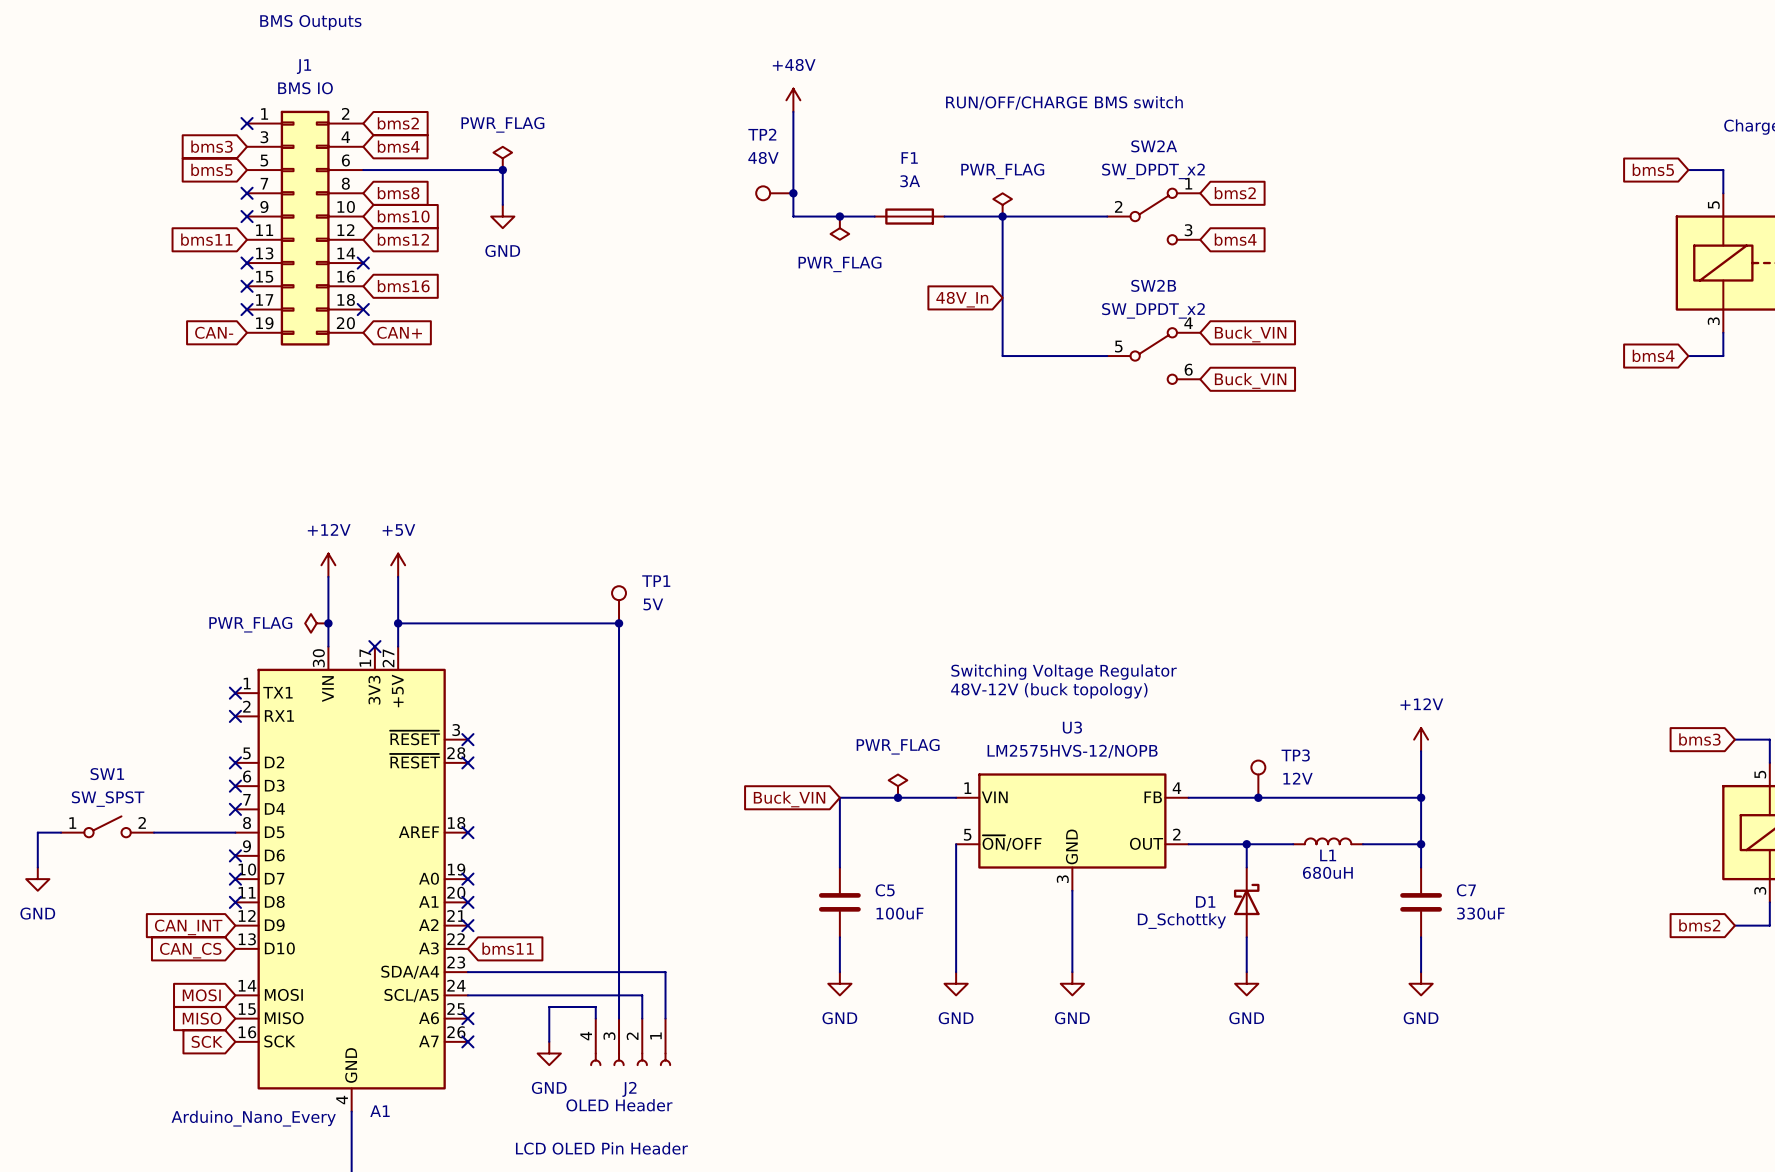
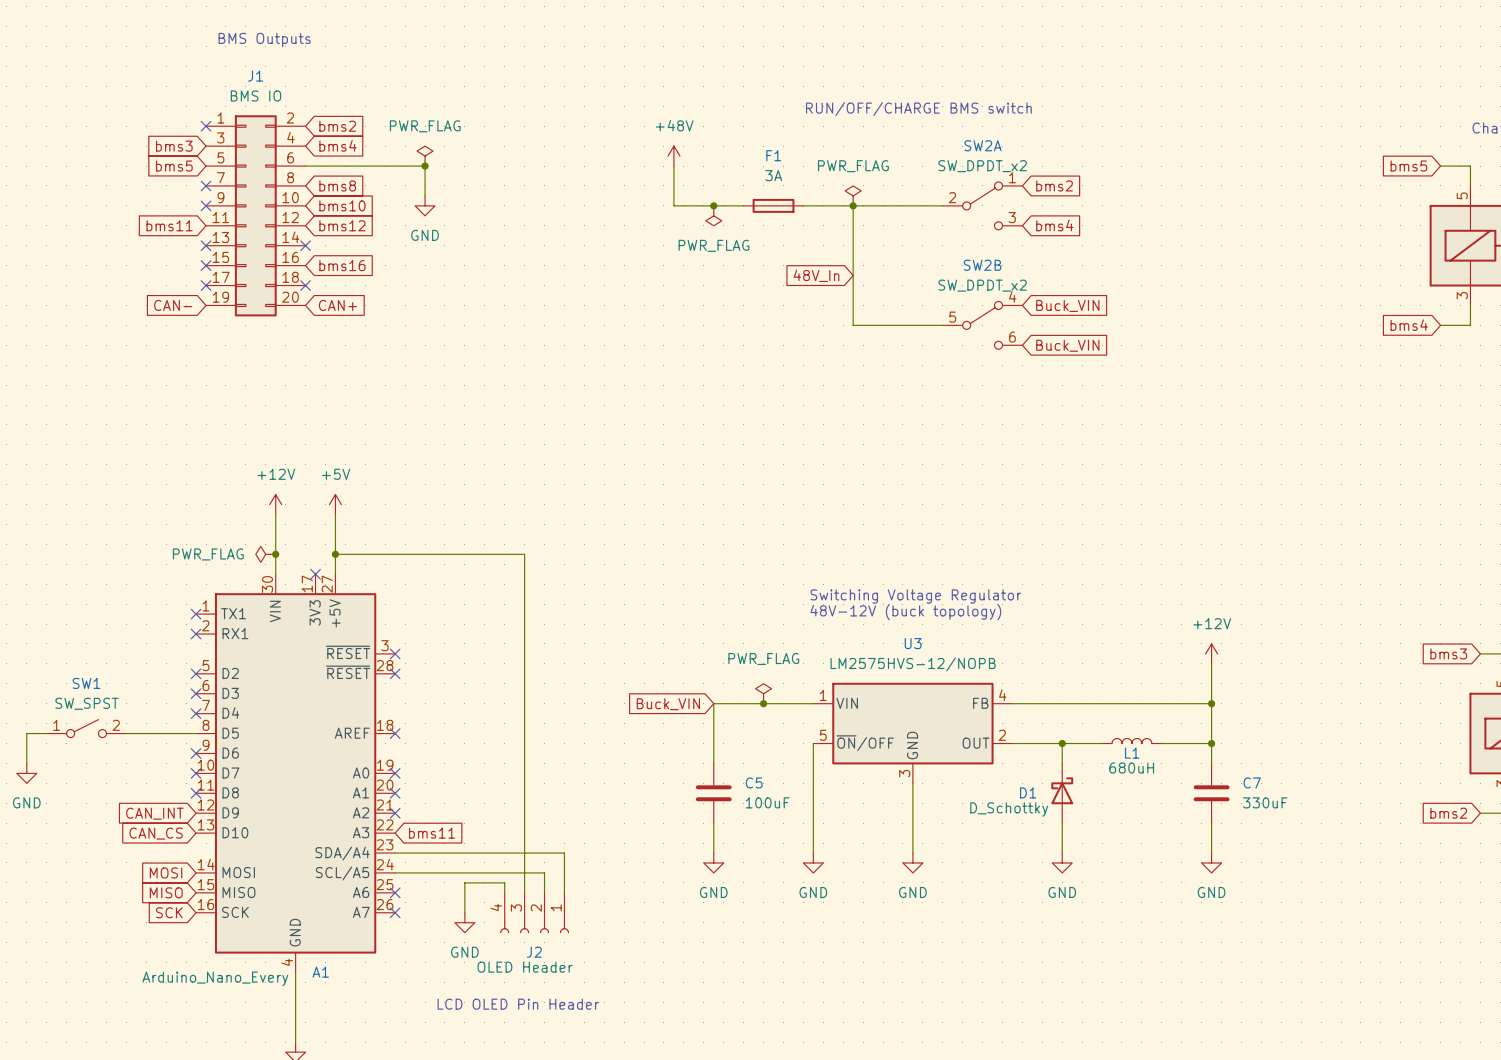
power symbol position: +48V (793, 100) -> +48V (673, 156)
wire: (793, 111) (793, 170) -> none
TP2: 48V (774, 193) -> none
junction: (793, 193) -> none
TP1: 5V (619, 604) -> none
junction: (619, 623) -> none
TP3: 12V (1258, 779) -> none
junction: (1258, 797) -> none

